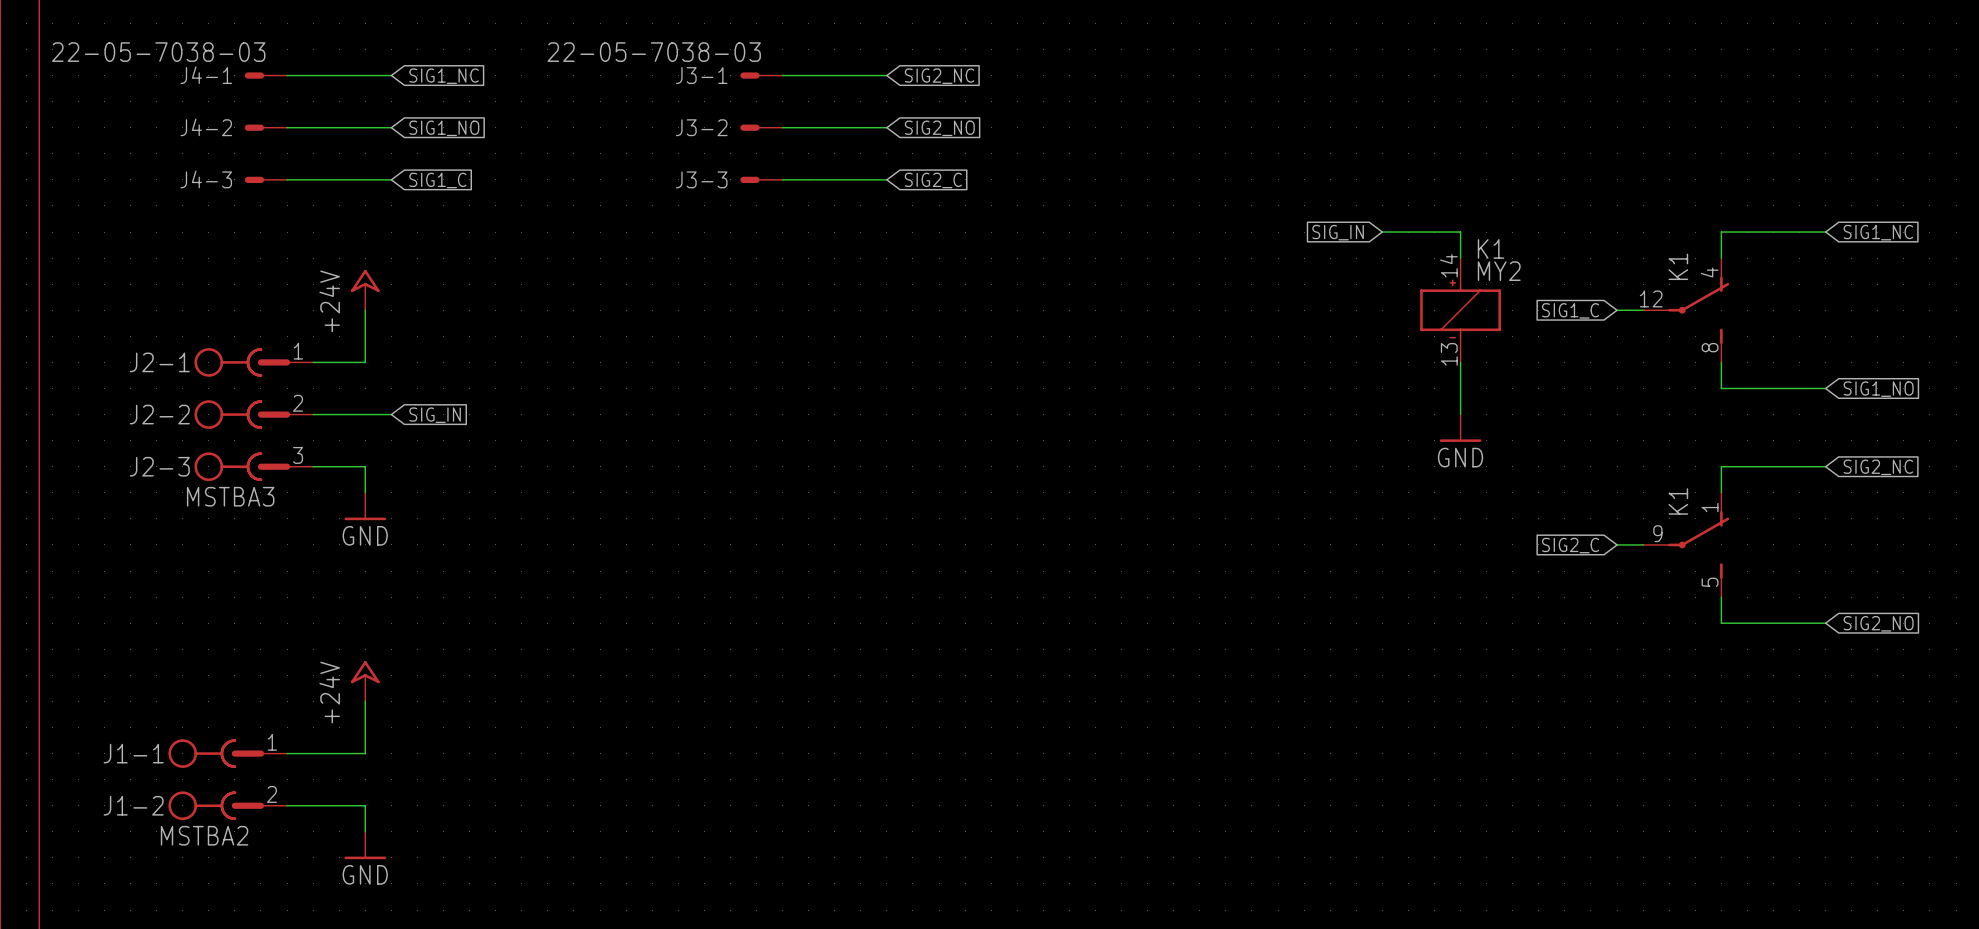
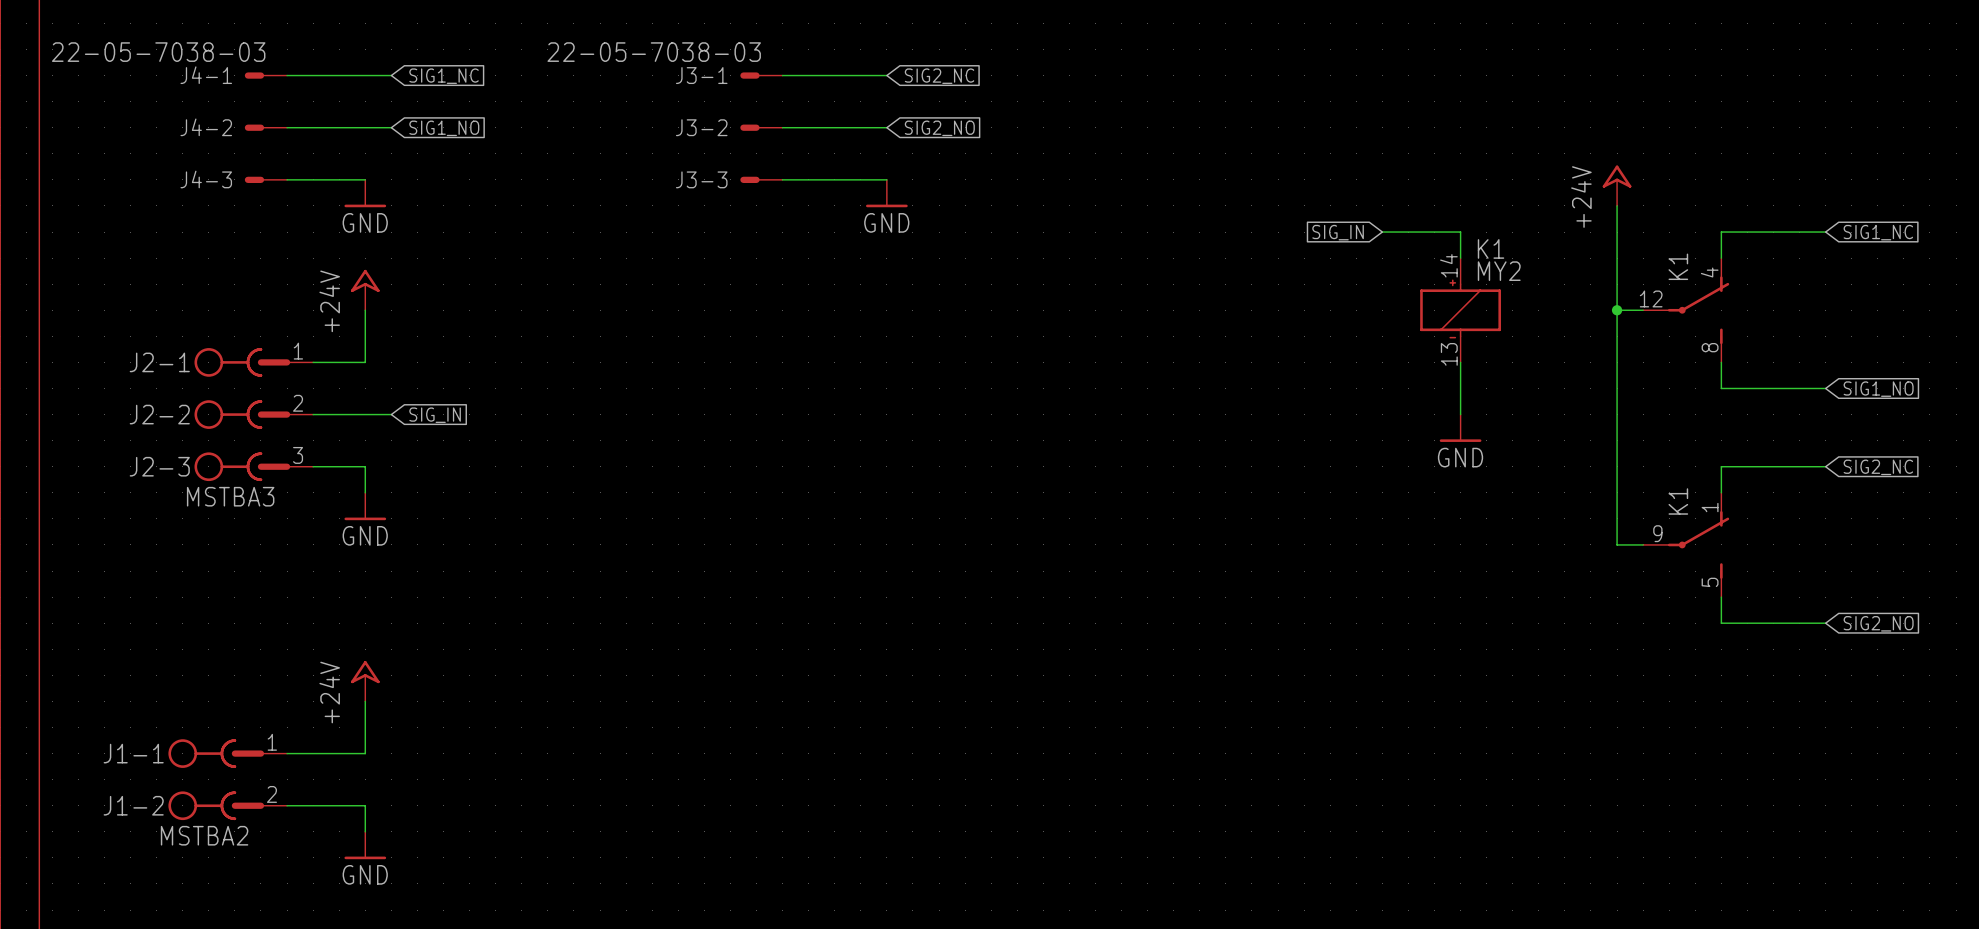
wire: (365, 179) (391, 179) -> none
global label: SIG1_C (437, 180) -> none
global label: SIG2_C (933, 180) -> none
power symbol: none -> +24V (1617, 185)
power symbol: none -> GND (365, 193)
power symbol: none -> GND (886, 193)
wire: none -> (1617, 205) (1617, 544)
global label: SIG1_C (1570, 310) -> none
junction: none -> (1617, 310)
global label: SIG2_C (1570, 545) -> none

